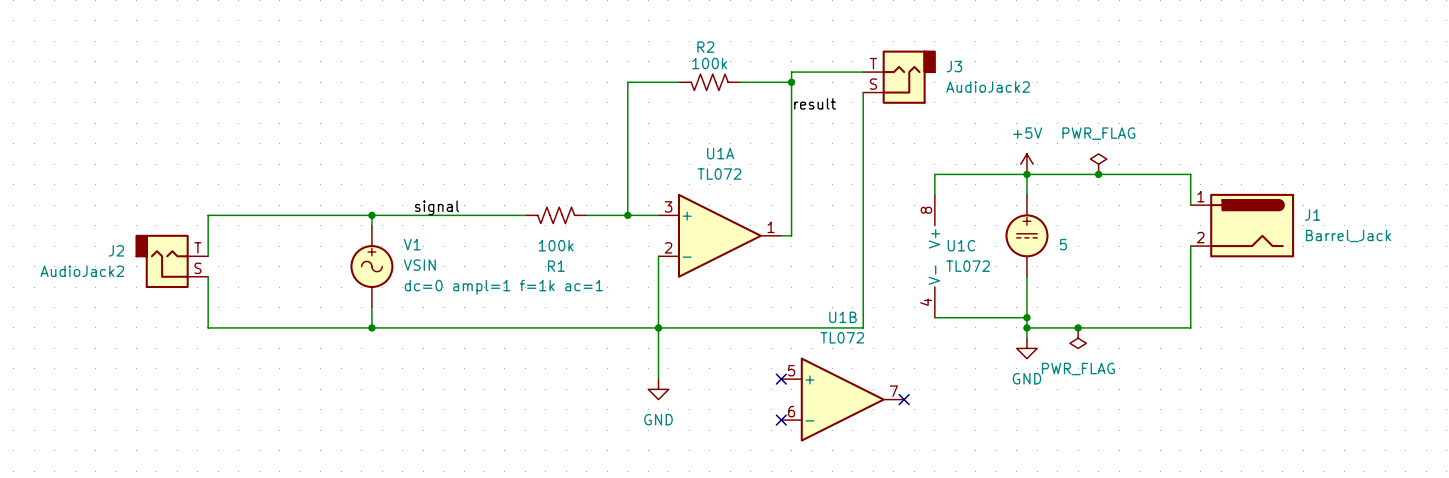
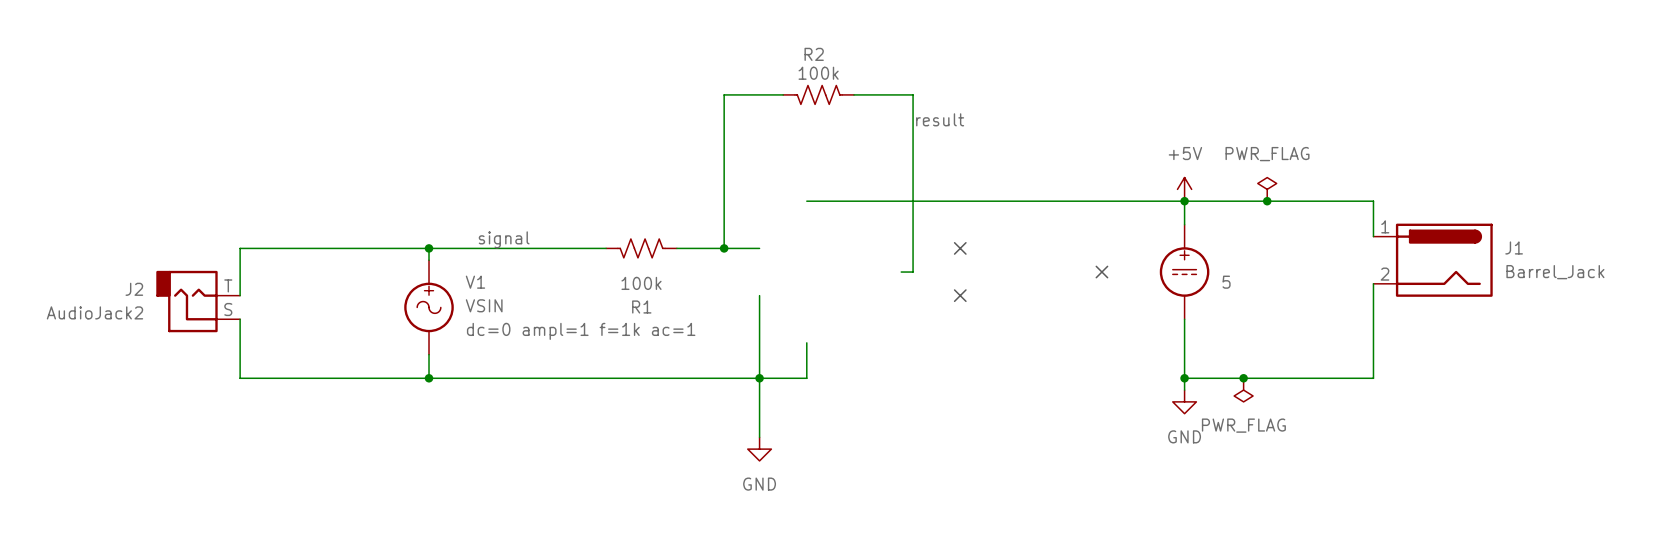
wire: (863, 72) (791, 72) (791, 82) -> none
J3: AudioJack2 (899, 77) -> none
junction: (791, 82) -> none
wire: (863, 92) (863, 327) (699, 327) -> (806, 342) (806, 378)
wire: (934, 174) (934, 194) -> (1078, 201) (806, 201)
no-connect mark: none -> (960, 248)
U1A: TL072 (719, 235) -> none
no-connect mark: none -> (1101, 272)
no-connect mark: none -> (960, 295)
U1C: TL072 (934, 256) -> none
wire: (934, 317) (1026, 317) -> none
junction: (1026, 317) -> none
no-connect mark: (781, 379) -> none
U1B: TL072 (842, 399) -> none
no-connect mark: (904, 399) -> none
no-connect mark: (781, 420) -> none

